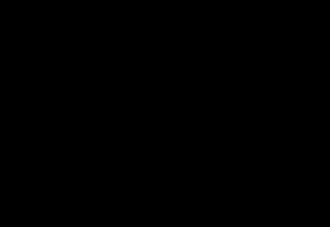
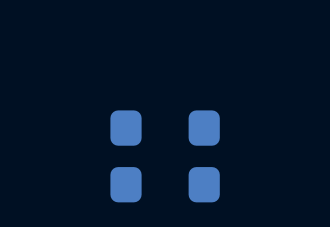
part: none -> (126, 156)
part: none -> (204, 156)

